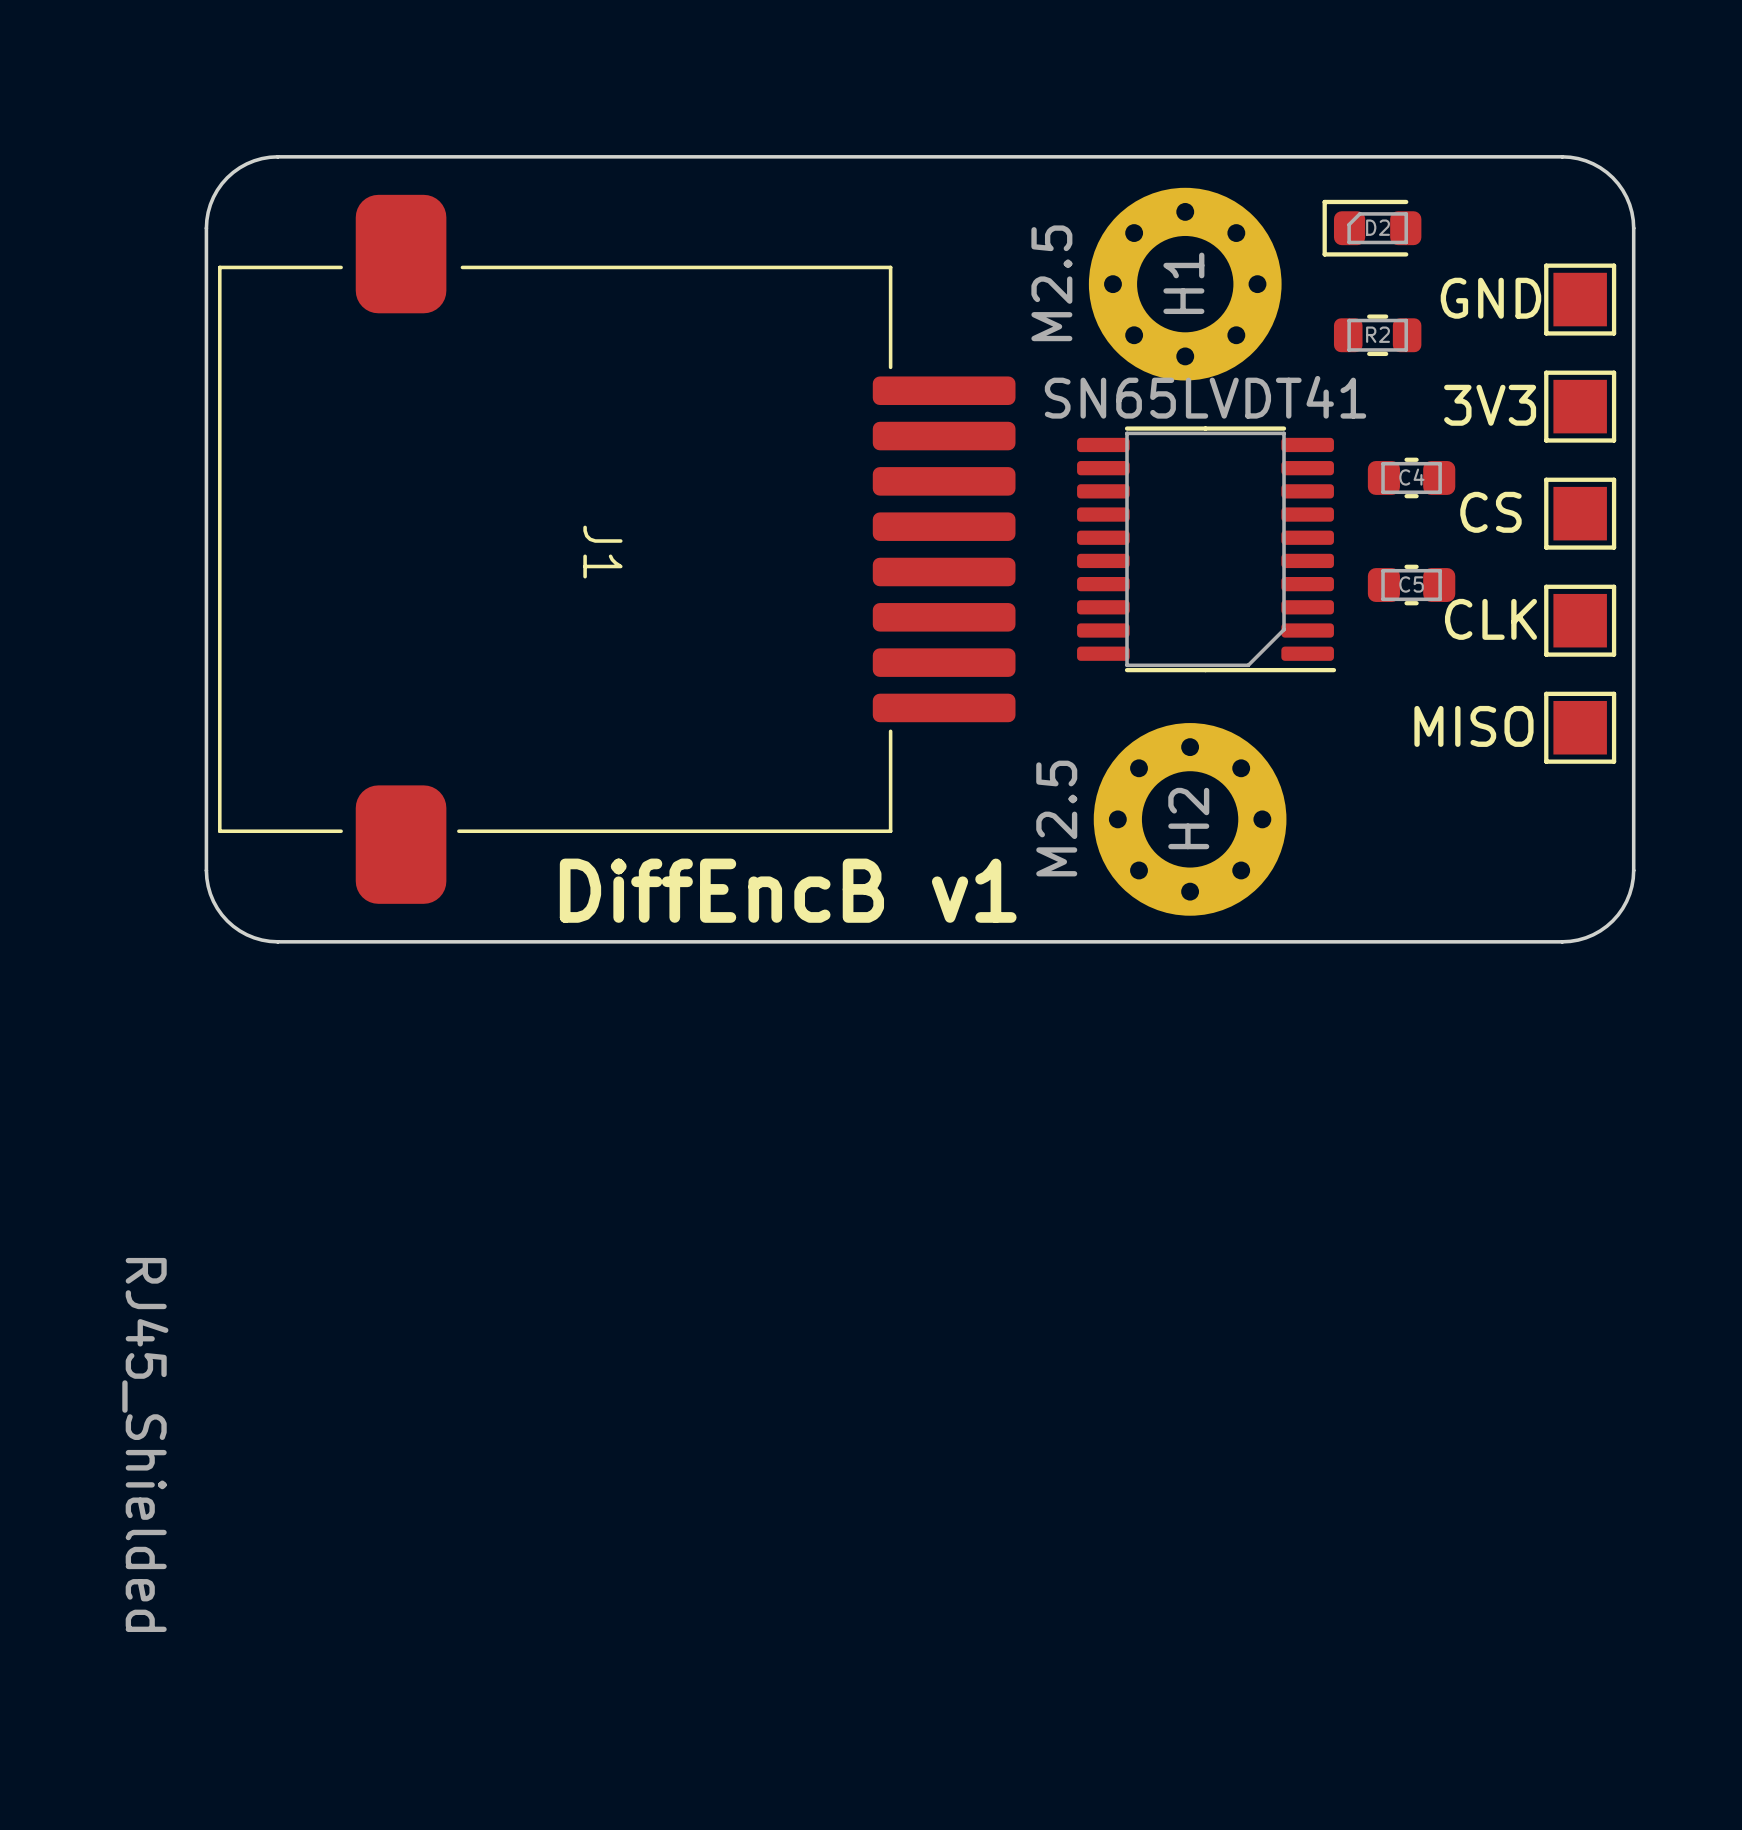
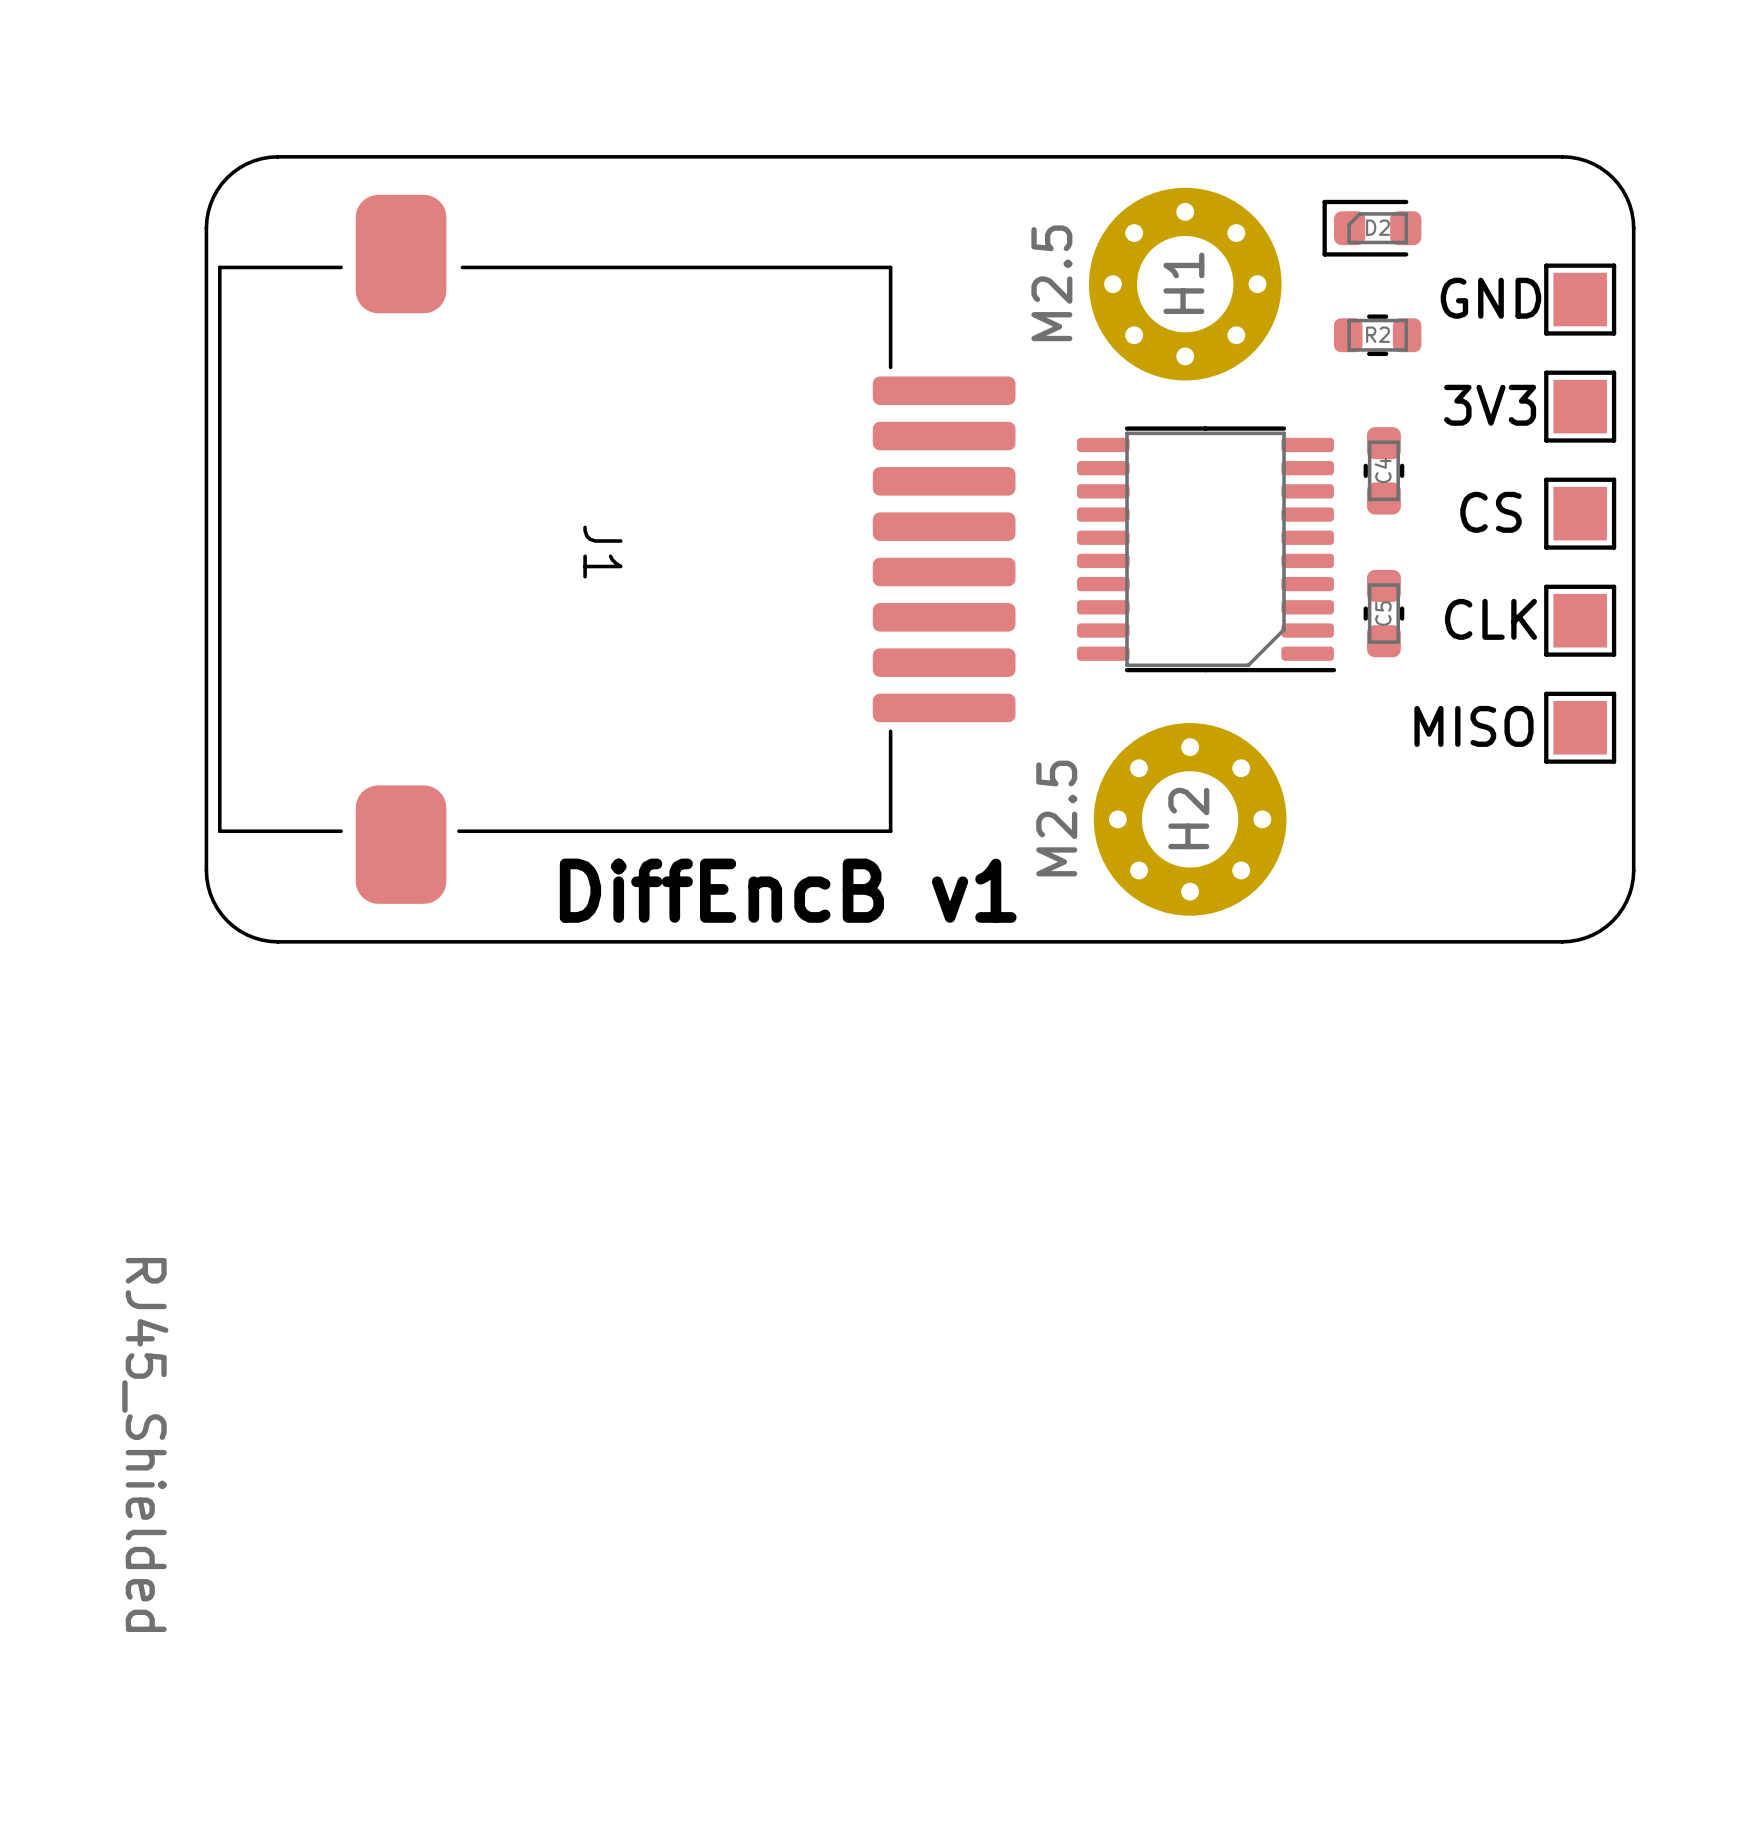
part value: SN65LVDT41 (1205, 397) -> none
C4 rotation: 0° (1411, 477) -> 90° clockwise (1383, 470)
C5 rotation: 0° (1411, 585) -> 90° clockwise (1383, 613)

